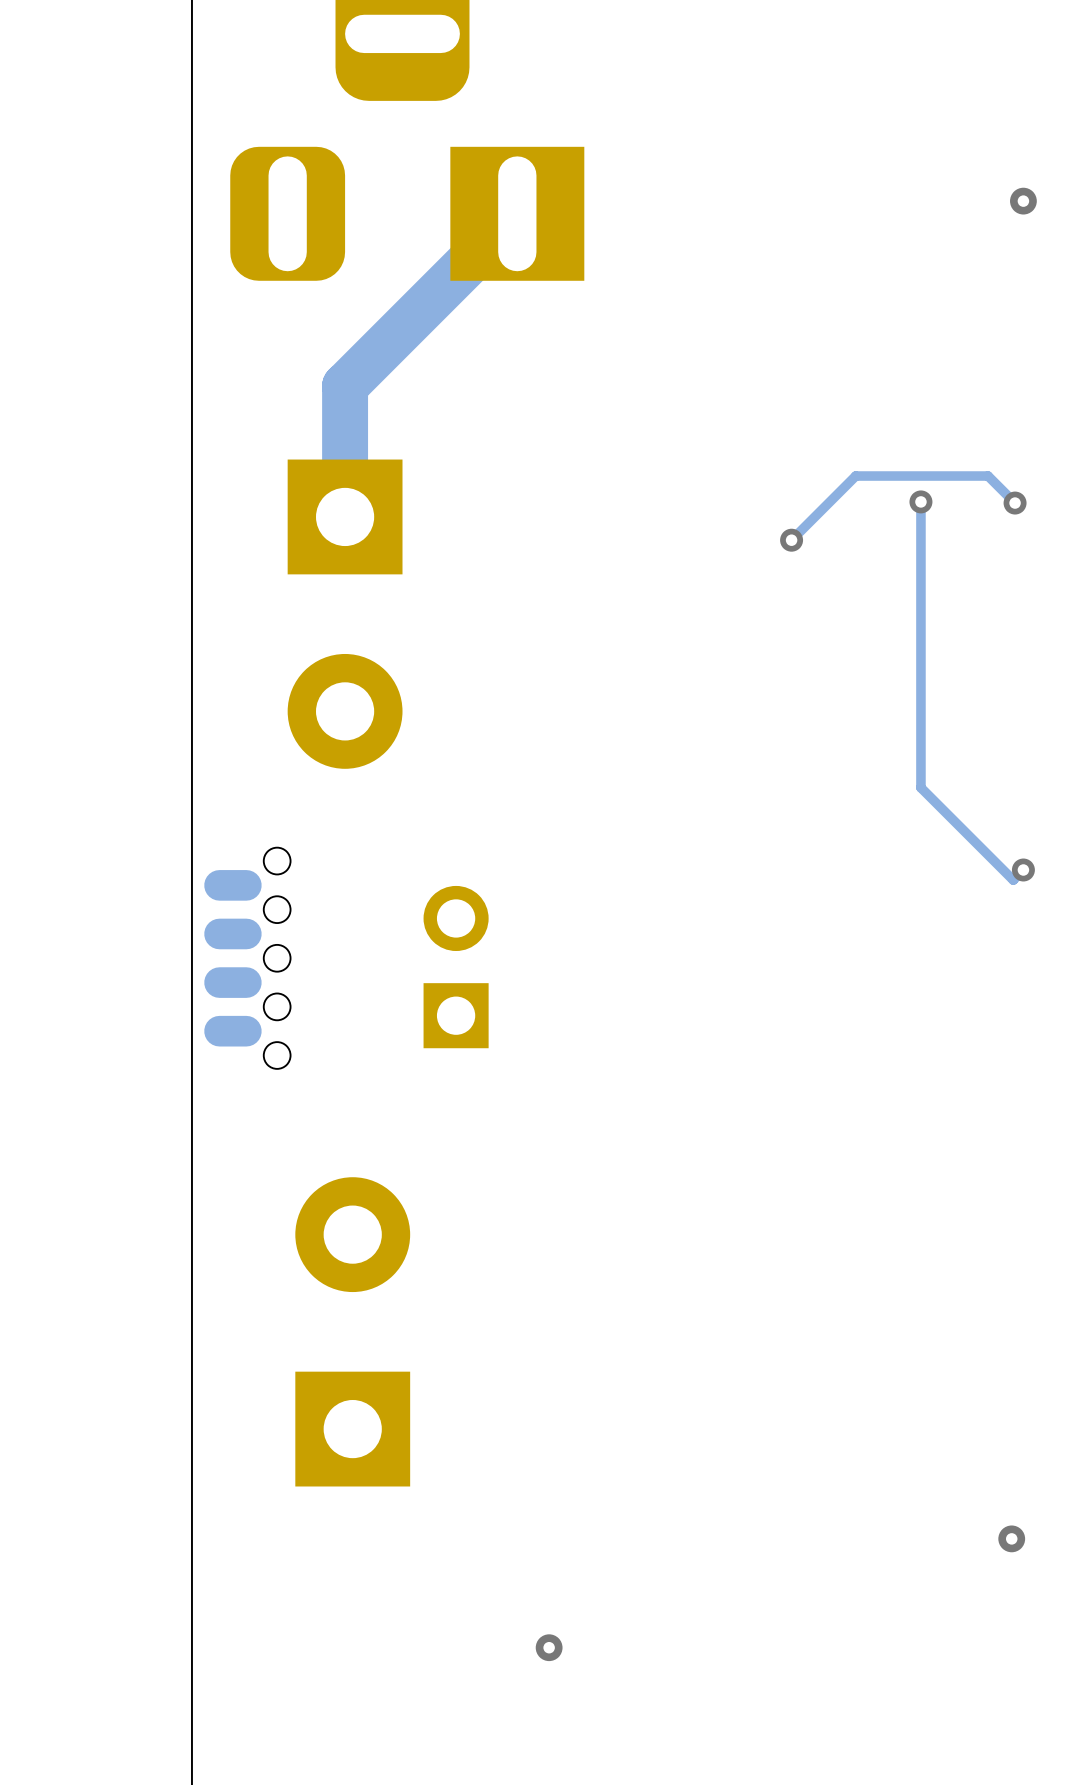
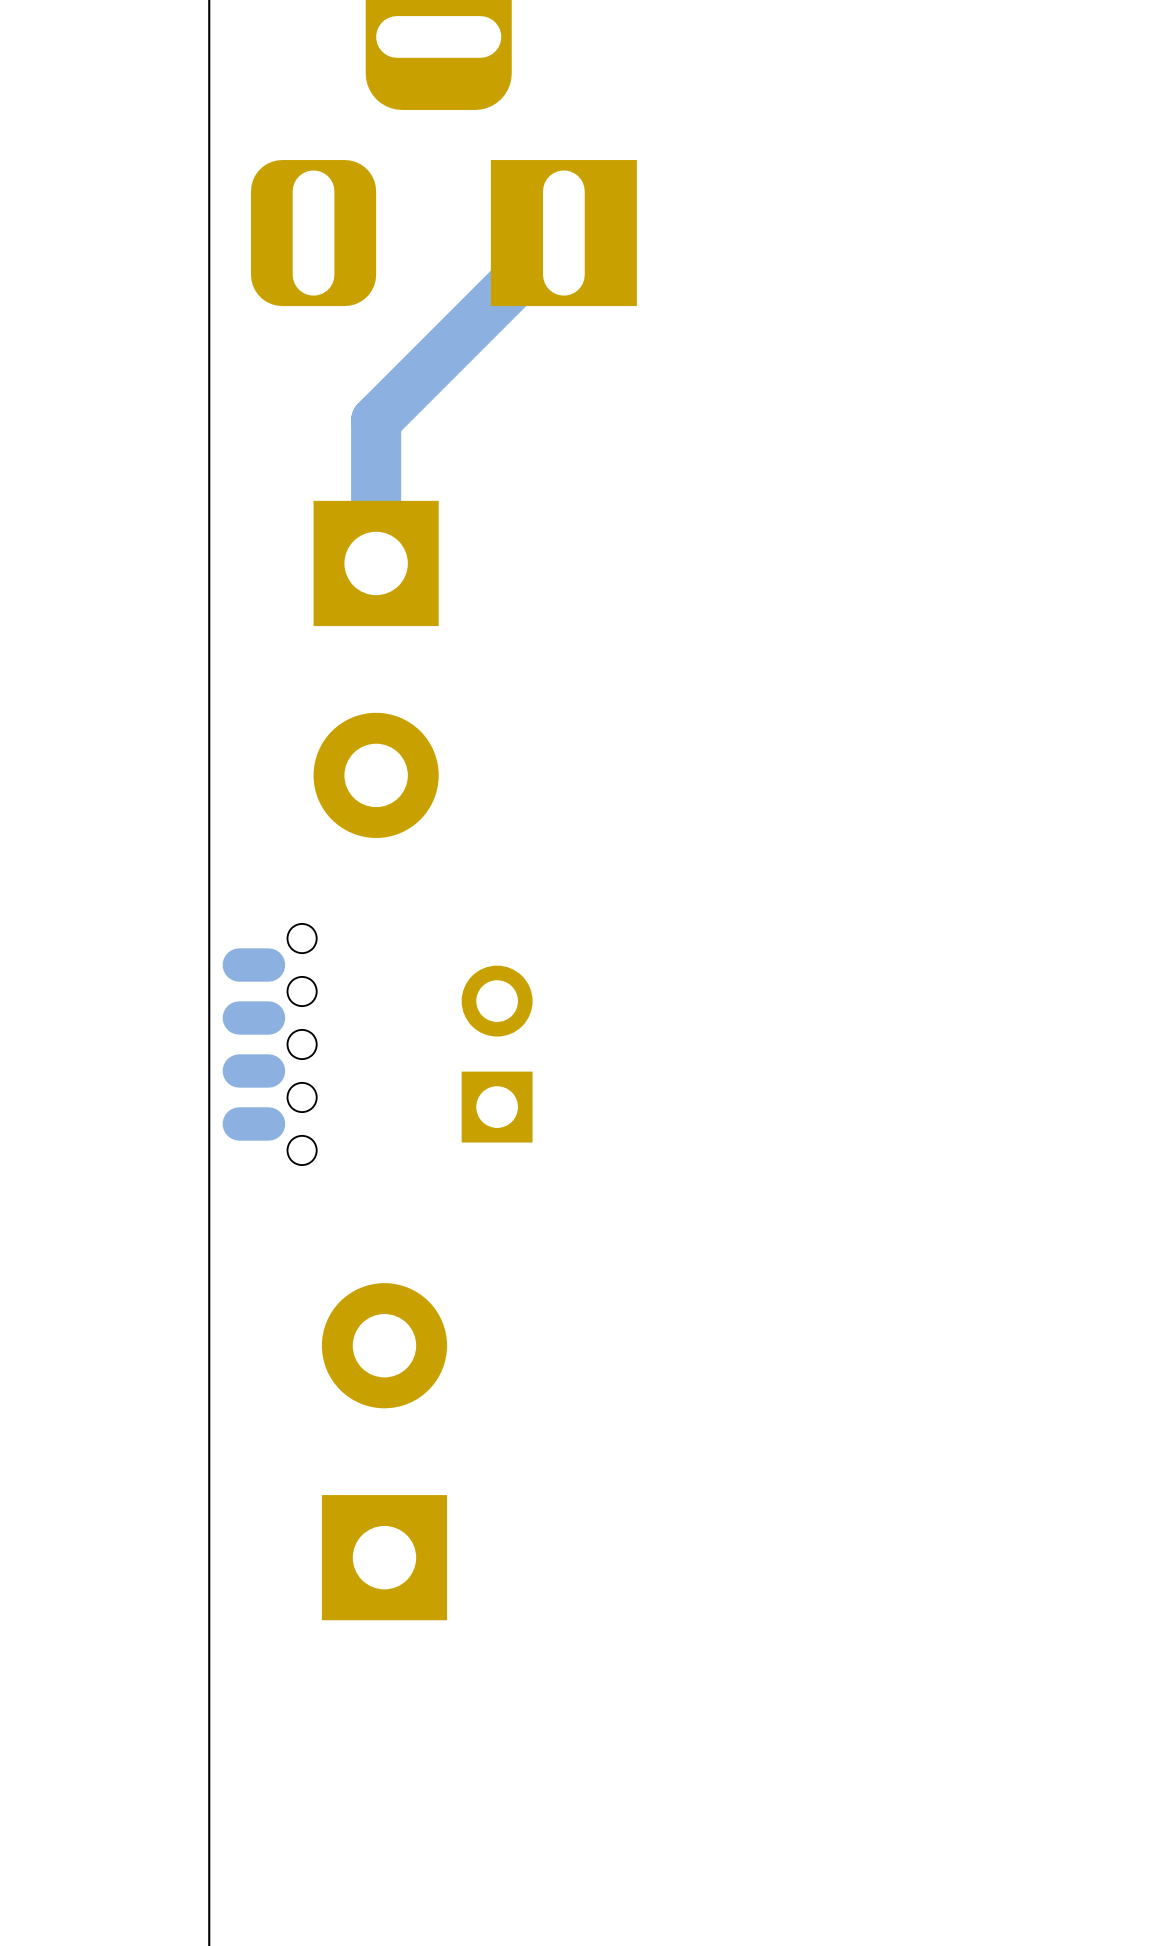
via: (1023, 201) -> none
track: (920, 501) (920, 787) (1013, 880) (1023, 870) -> none
via: (920, 501) -> none
track: (1015, 503) (988, 476) (855, 476) (791, 540) -> none
via: (1015, 503) -> none
via: (791, 540) -> none
via: (1023, 870) -> none
via: (1011, 1538) -> none
via: (549, 1647) -> none

